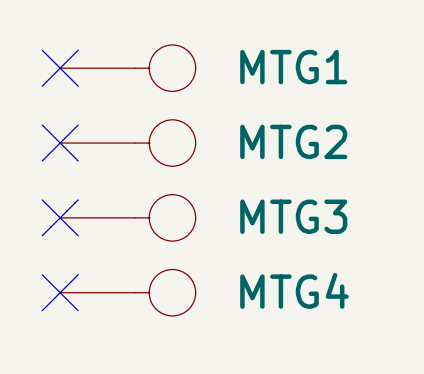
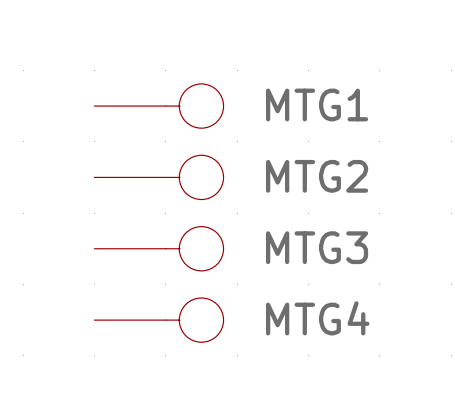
no-connect mark: (60, 68) -> none
no-connect mark: (60, 143) -> none
no-connect mark: (60, 217) -> none
no-connect mark: (60, 292) -> none

